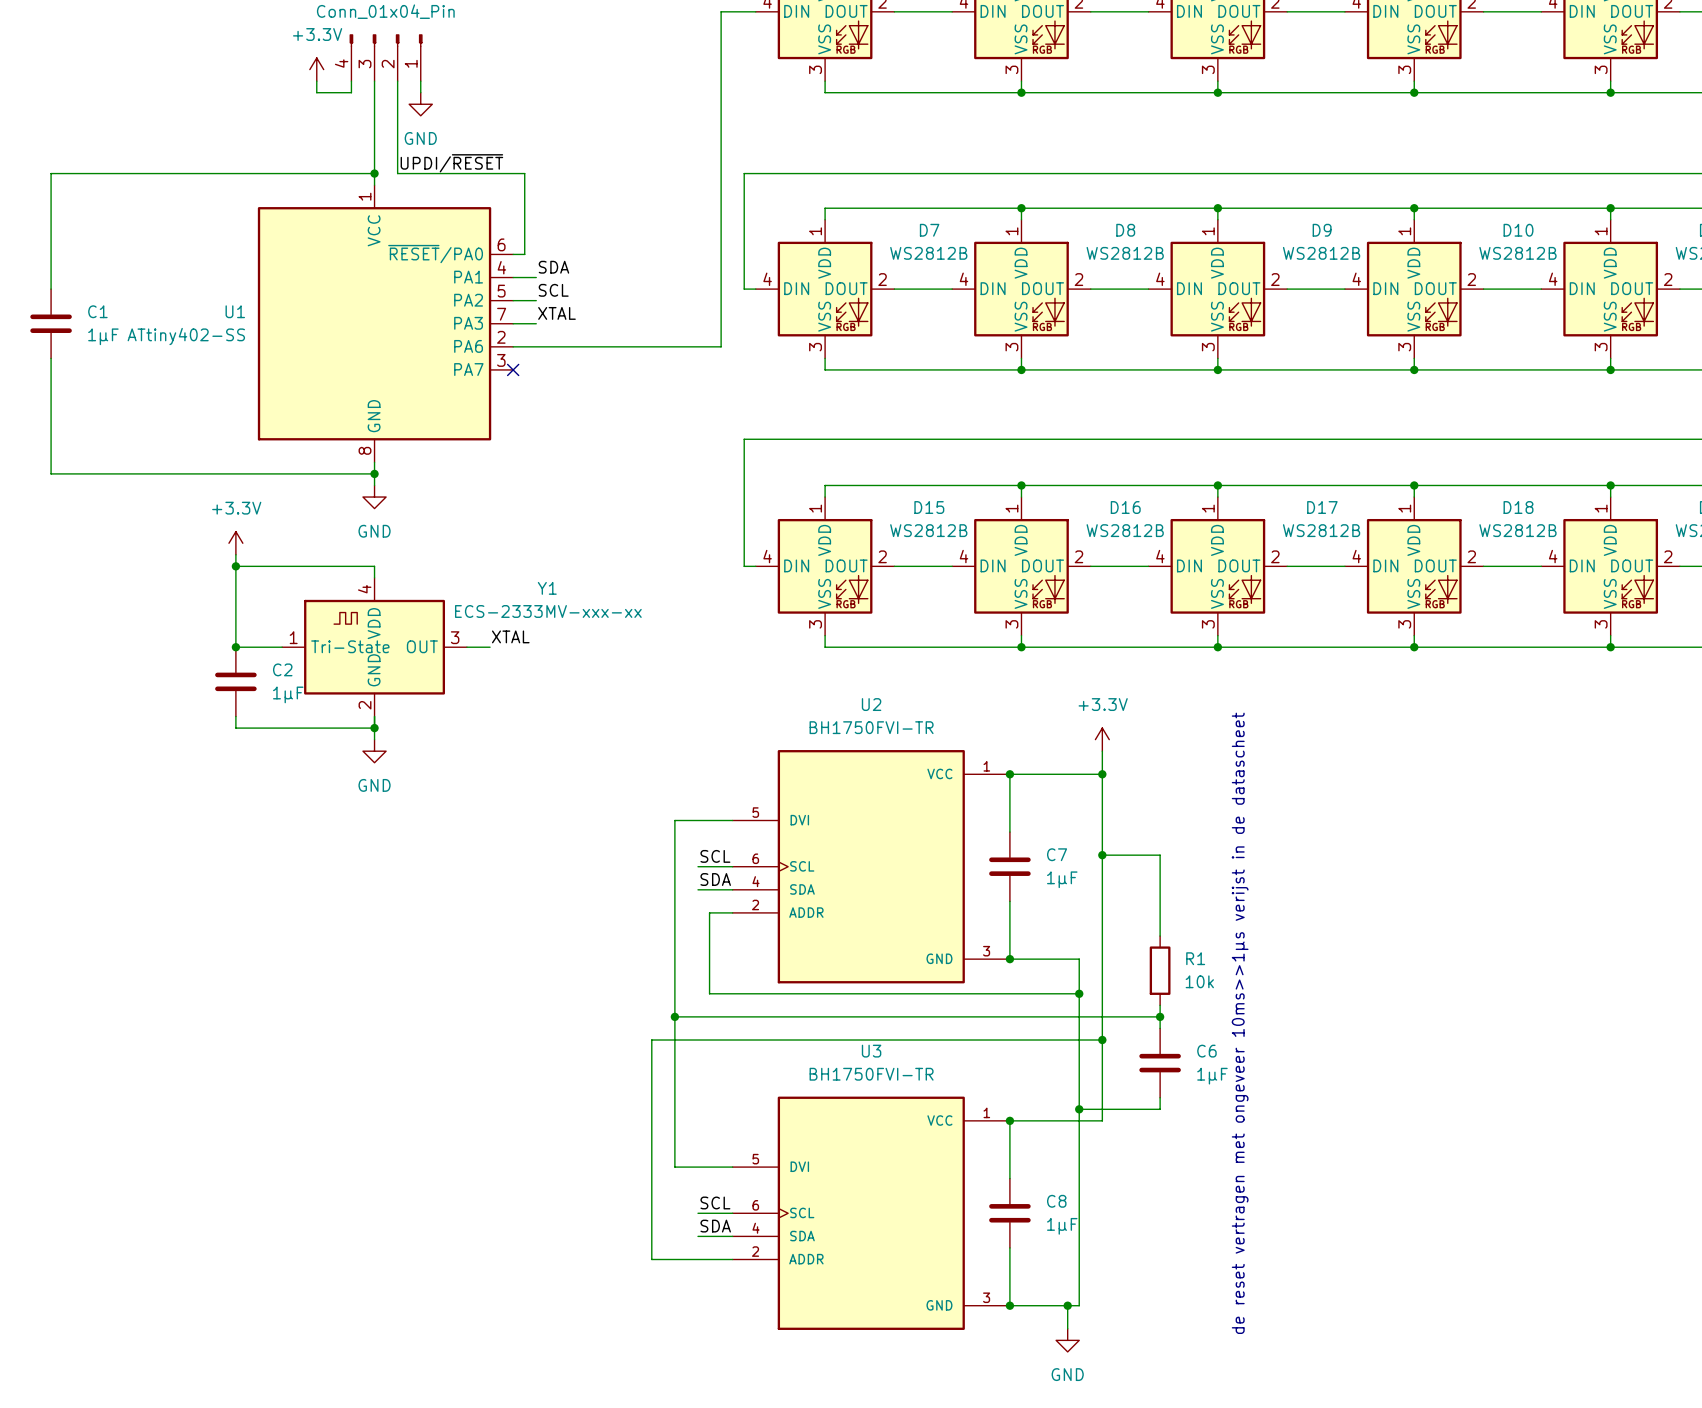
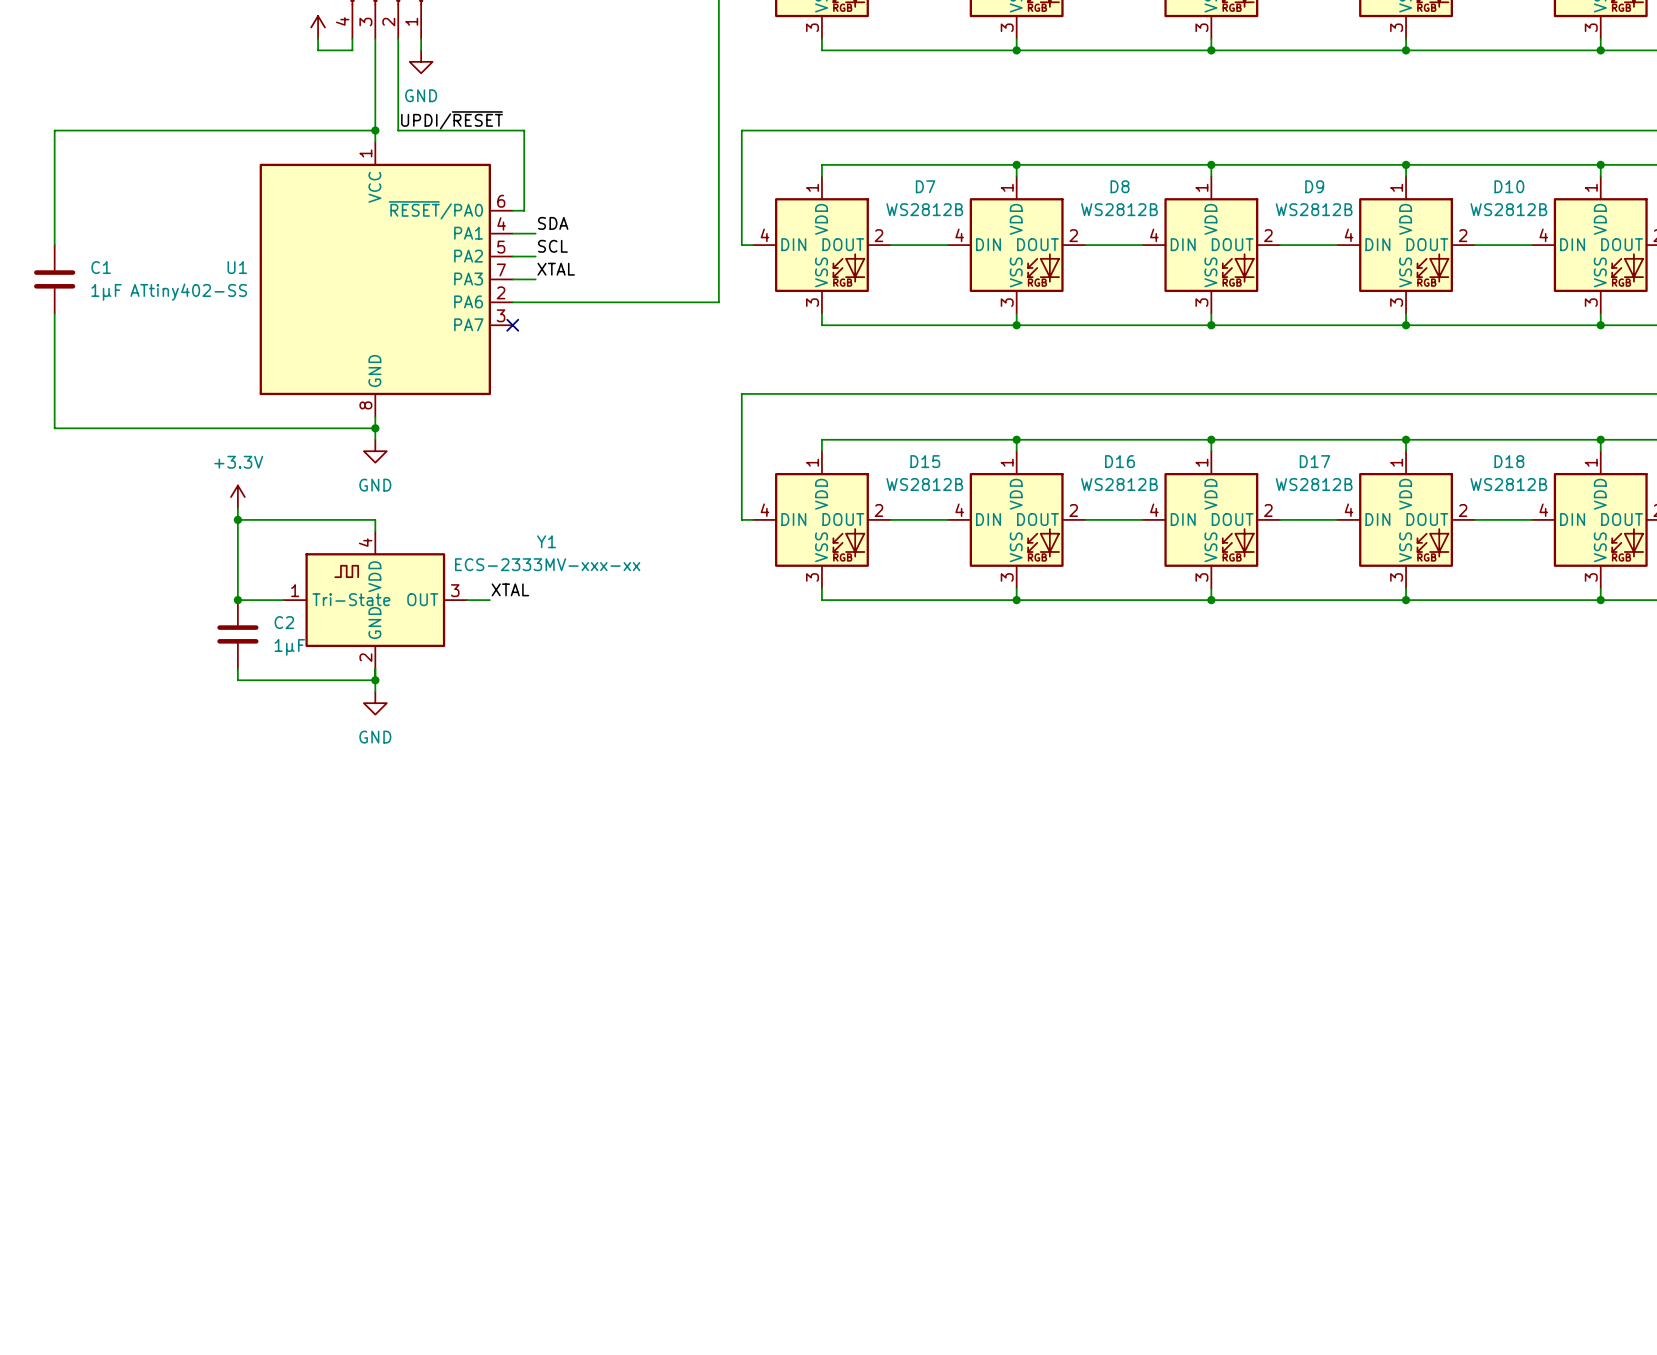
power symbol: +3.3V (1102, 739) -> none
wire: (1102, 751) (1102, 1120) (1009, 1120) (1009, 1178) -> none
junction: (1009, 774) -> none
wire: (1102, 774) (1009, 774) (1009, 832) -> none
junction: (1102, 774) -> none
wire: (732, 820) (674, 820) (674, 1167) (732, 1167) -> none
wire: (1102, 855) (1160, 855) (1160, 936) -> none
junction: (1102, 855) -> none
label: SCL (715, 856) -> none
wire: (698, 866) (732, 866) -> none
U2: BH1750FVI-TR (871, 866) -> none
C7: 1µF (1009, 866) -> none
label: SDA (715, 879) -> none
wire: (698, 889) (732, 889) -> none
wire: (1009, 901) (1009, 959) (1079, 959) (1079, 1305) (1009, 1305) (1009, 1247) -> none
wire: (732, 912) (709, 912) (709, 993) (1079, 993) -> none
junction: (1009, 959) -> none
R1: 10k (1160, 970) -> none
junction: (1079, 993) -> none
wire: (1160, 1005) (1160, 1028) -> none
wire: (674, 1016) (1160, 1016) -> none
junction: (674, 1016) -> none
junction: (1160, 1016) -> none
text: de reset vertragen met ongeveer 10ms>>1µs verijst in de datascheet (1240, 1023) -> none
wire: (1102, 1040) (651, 1040) (651, 1259) (732, 1259) -> none
junction: (1102, 1040) -> none
C6: 1µF (1160, 1063) -> none
wire: (1160, 1097) (1160, 1109) (1079, 1109) -> none
junction: (1079, 1109) -> none
junction: (1009, 1120) -> none
label: SCL (715, 1202) -> none
wire: (698, 1213) (732, 1213) -> none
U3: BH1750FVI-TR (871, 1213) -> none
C8: 1µF (1009, 1213) -> none
label: SDA (715, 1226) -> none
wire: (698, 1236) (732, 1236) -> none
junction: (1009, 1305) -> none
wire: (1067, 1305) (1067, 1328) -> none
junction: (1067, 1305) -> none
power symbol: GND (1067, 1340) -> none

